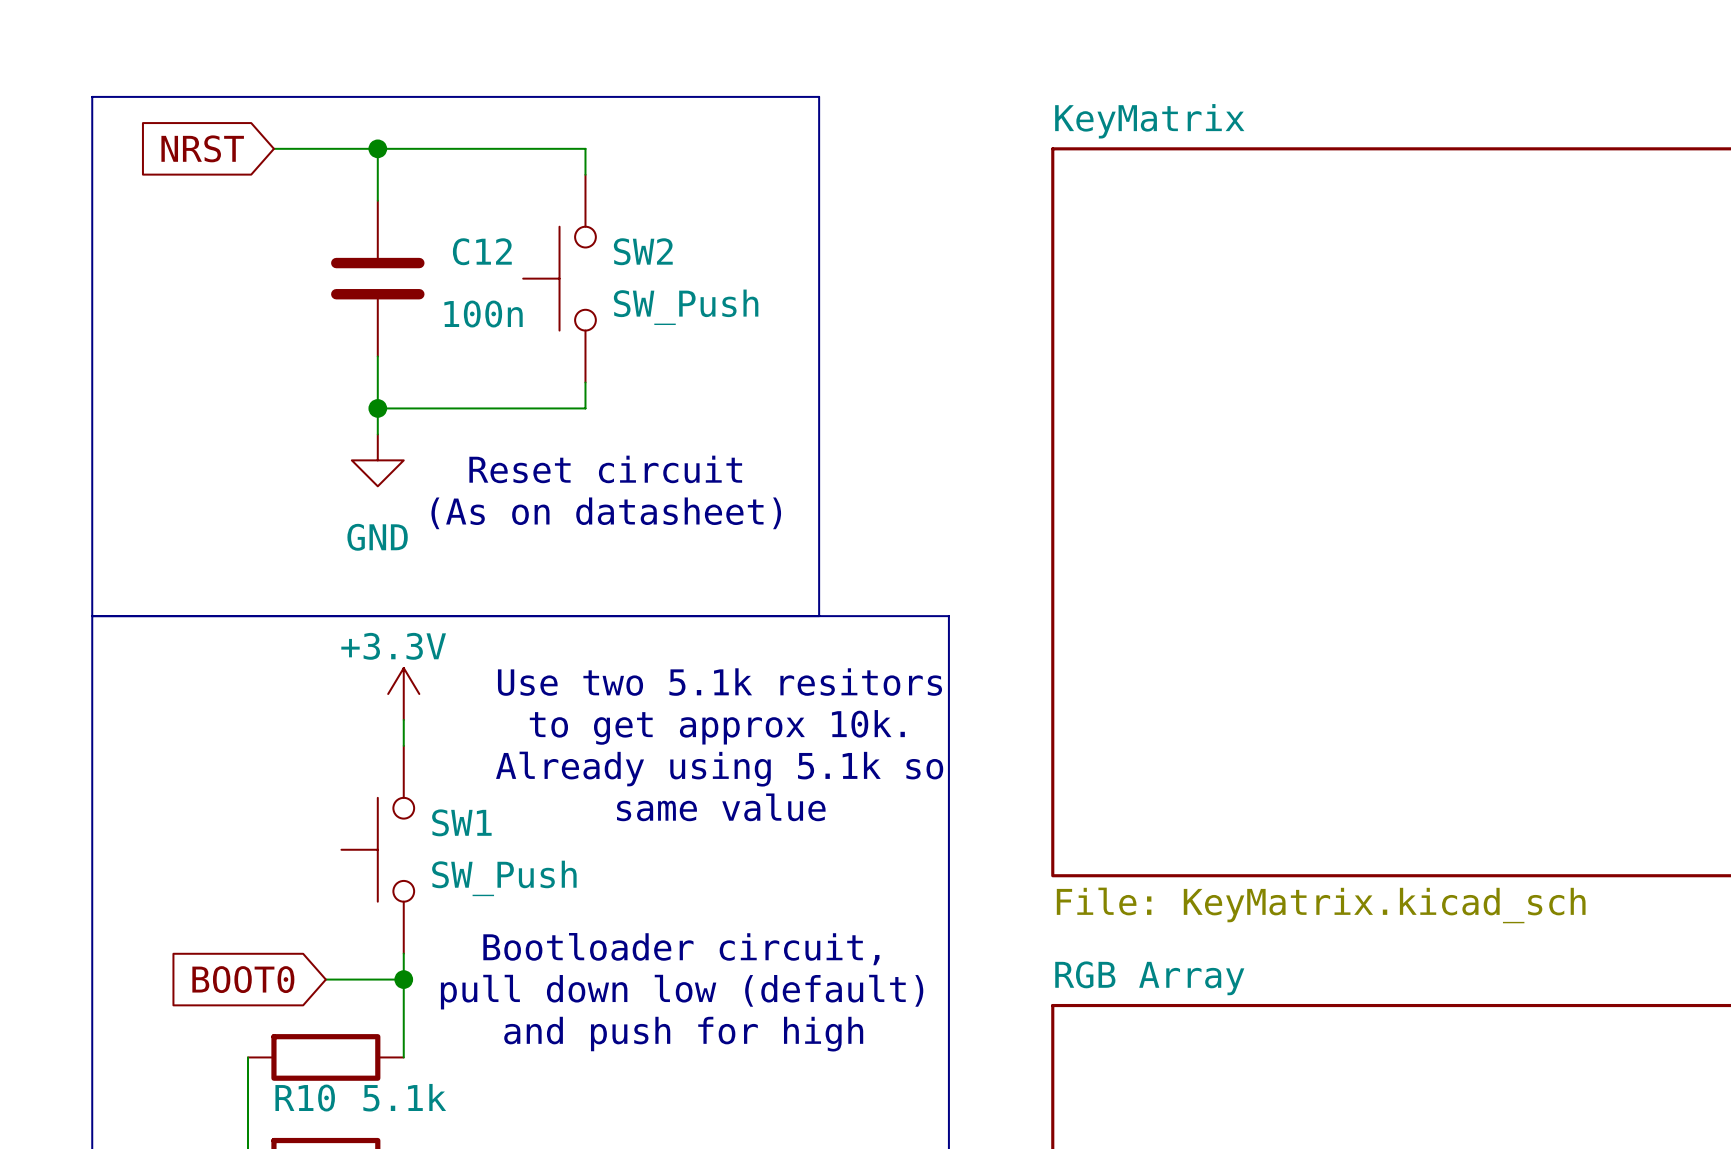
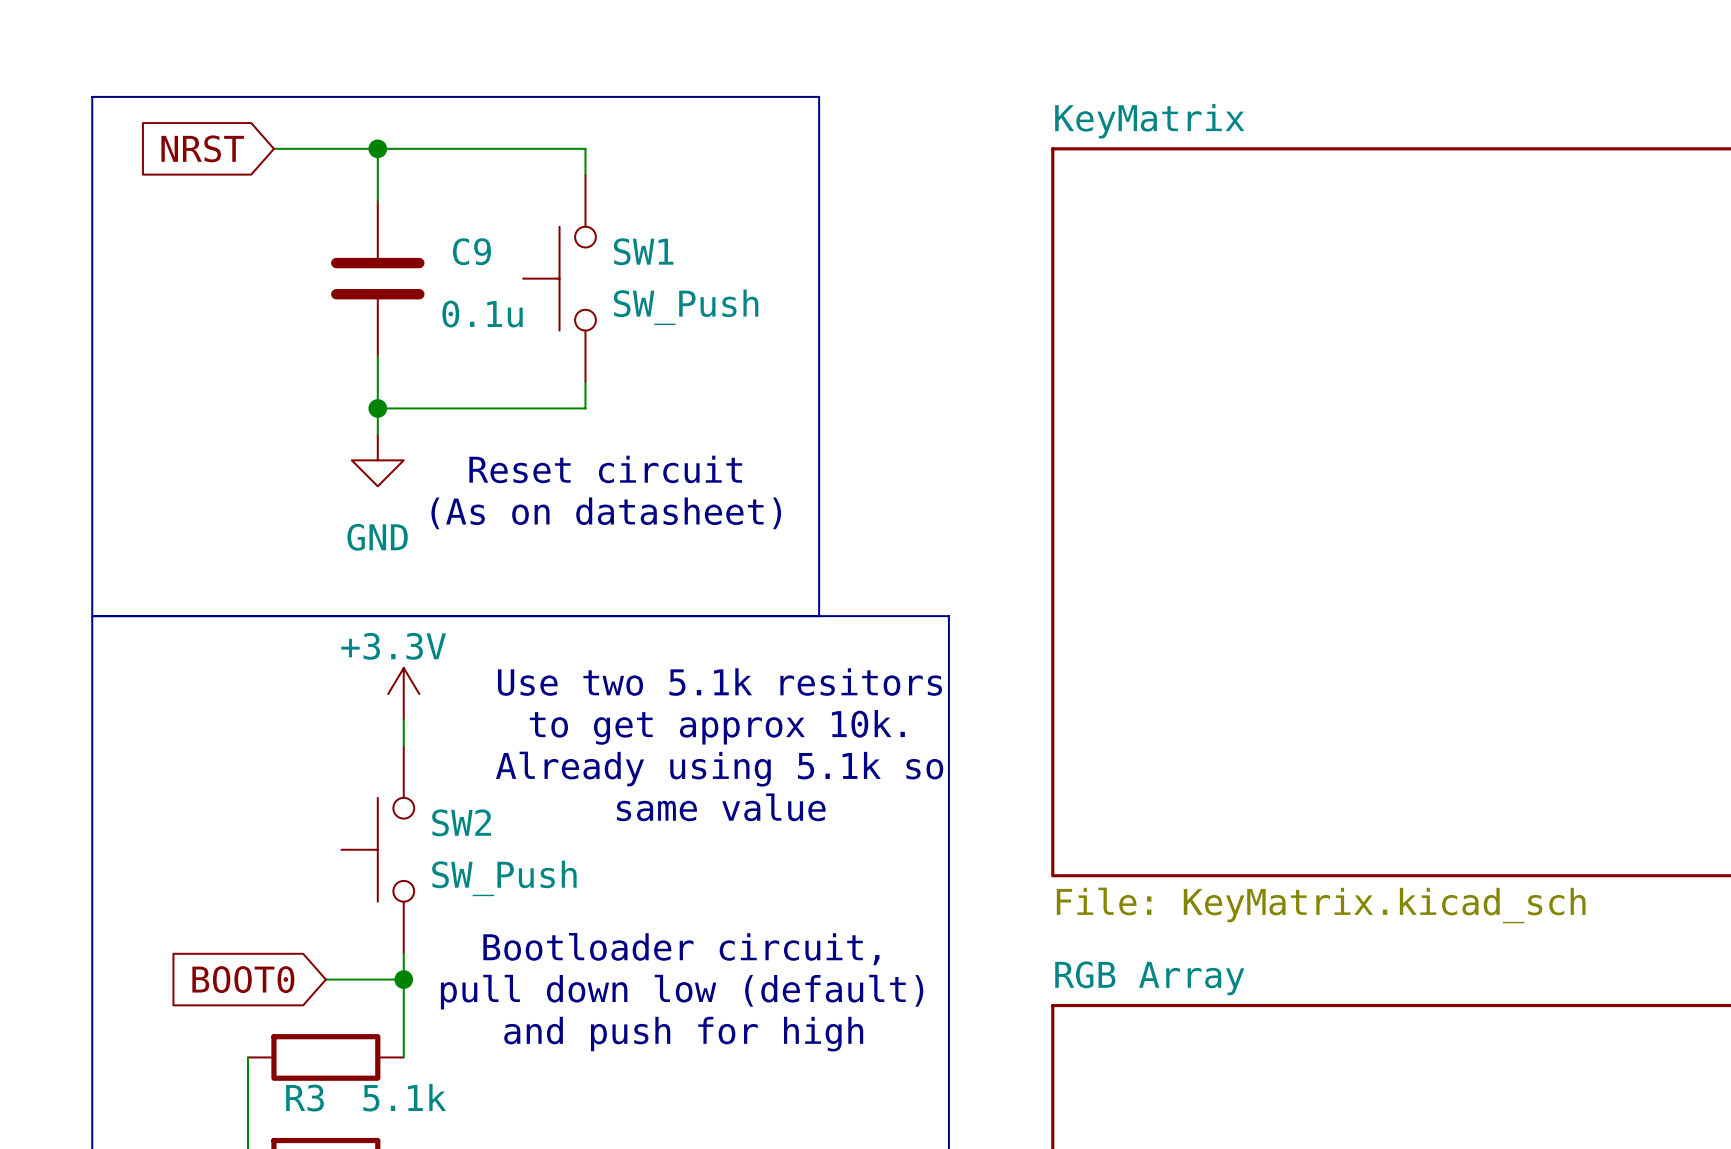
C12 name: C12 (482, 251) -> C9 (471, 251)
SW2 name: SW2 (643, 251) -> SW1 (643, 251)
C12 value: 100n (483, 314) -> 0.1u (482, 314)
SW1 name: SW1 (461, 822) -> SW2 (461, 822)
R10 name: R10 (305, 1098) -> R3 (305, 1098)

